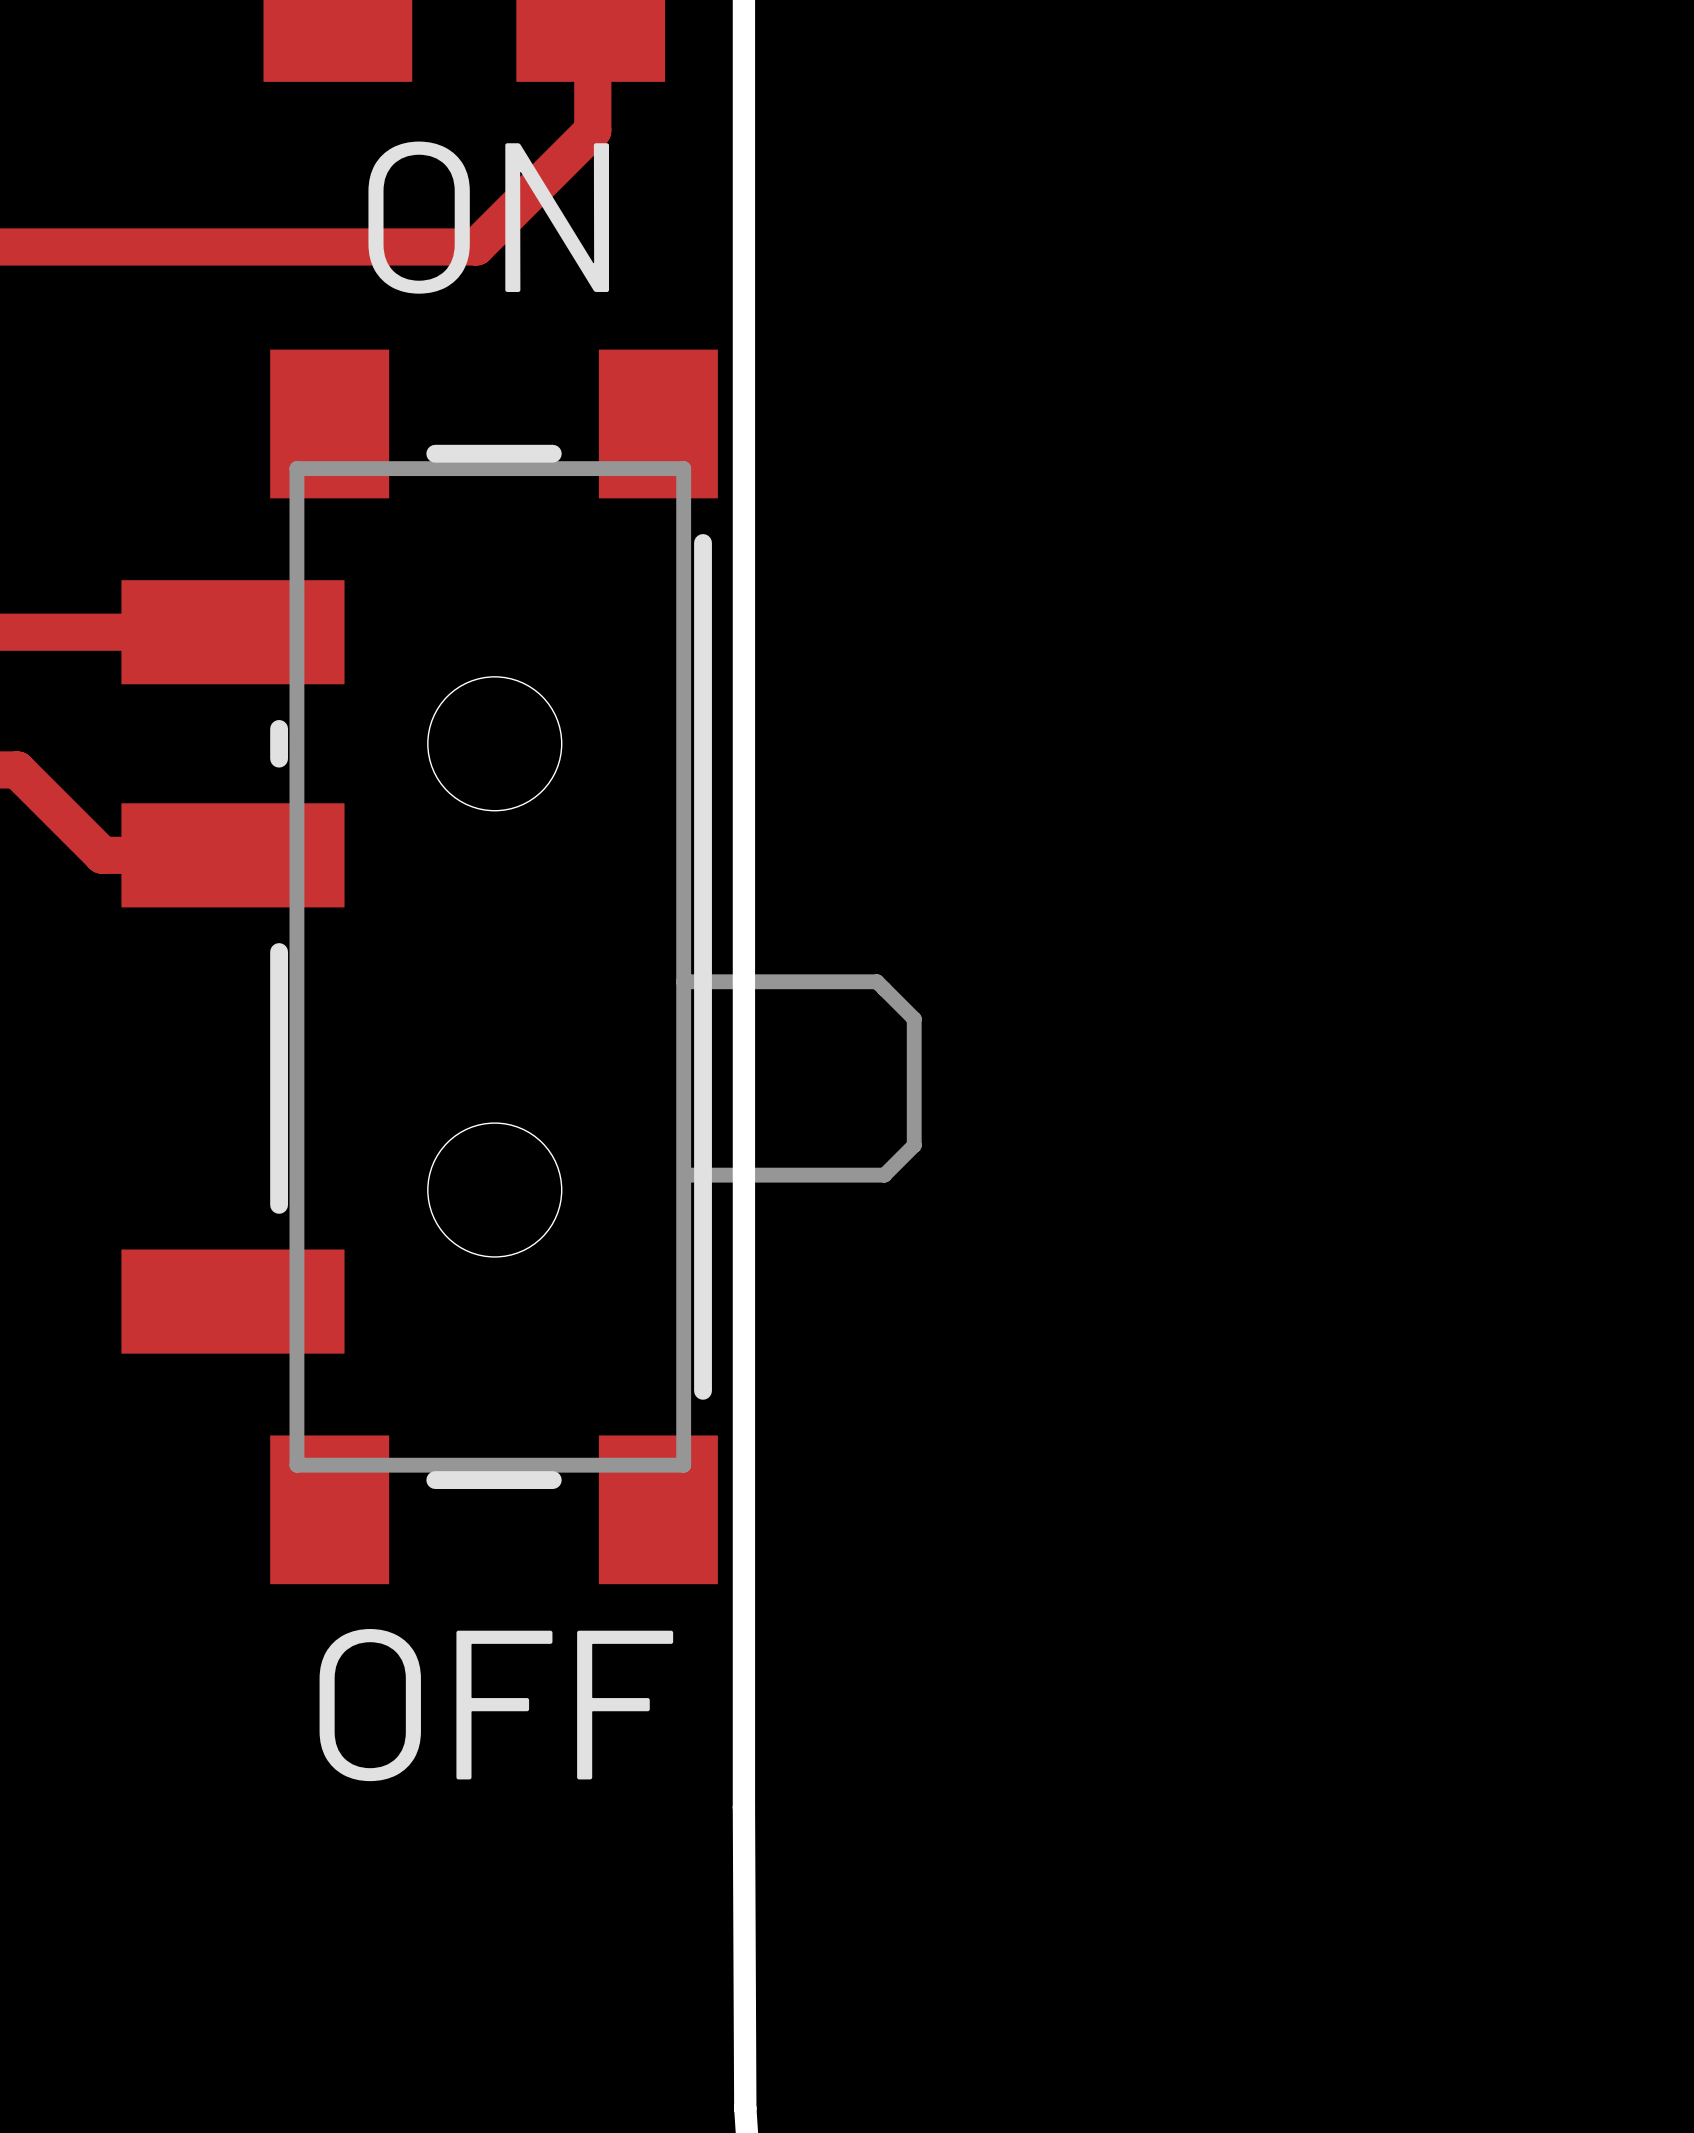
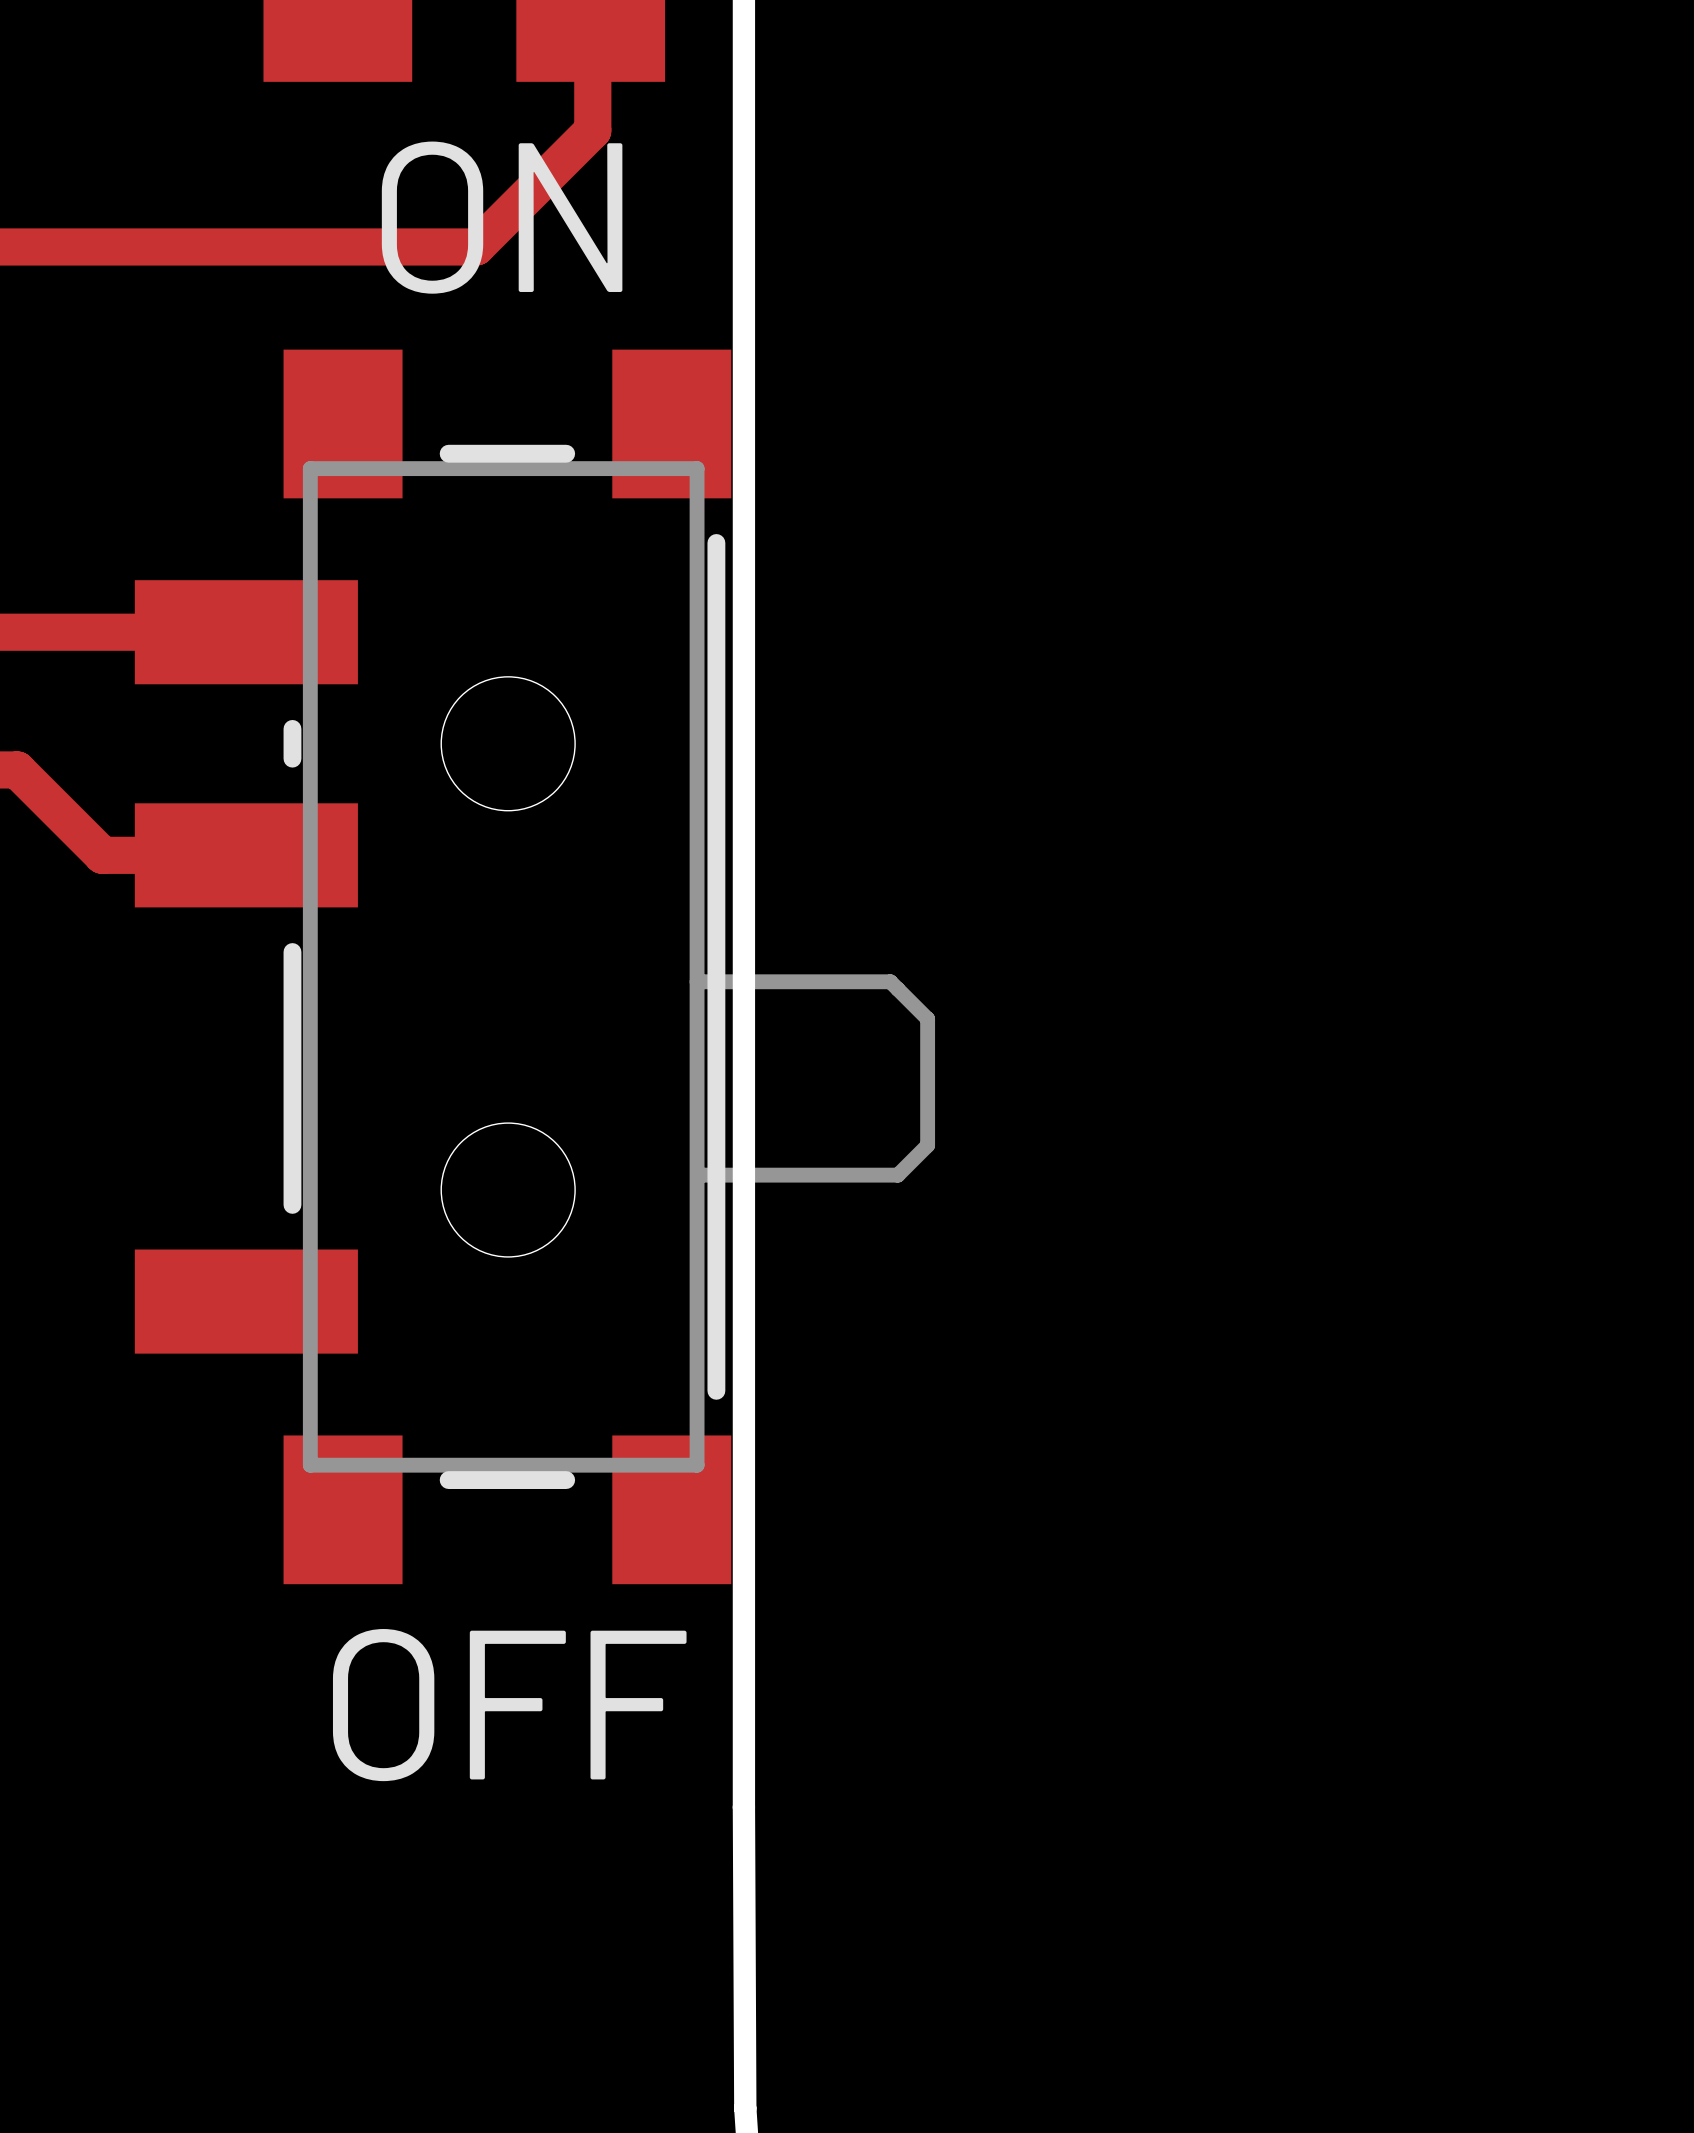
part position: (521, 966) -> (534, 966)

